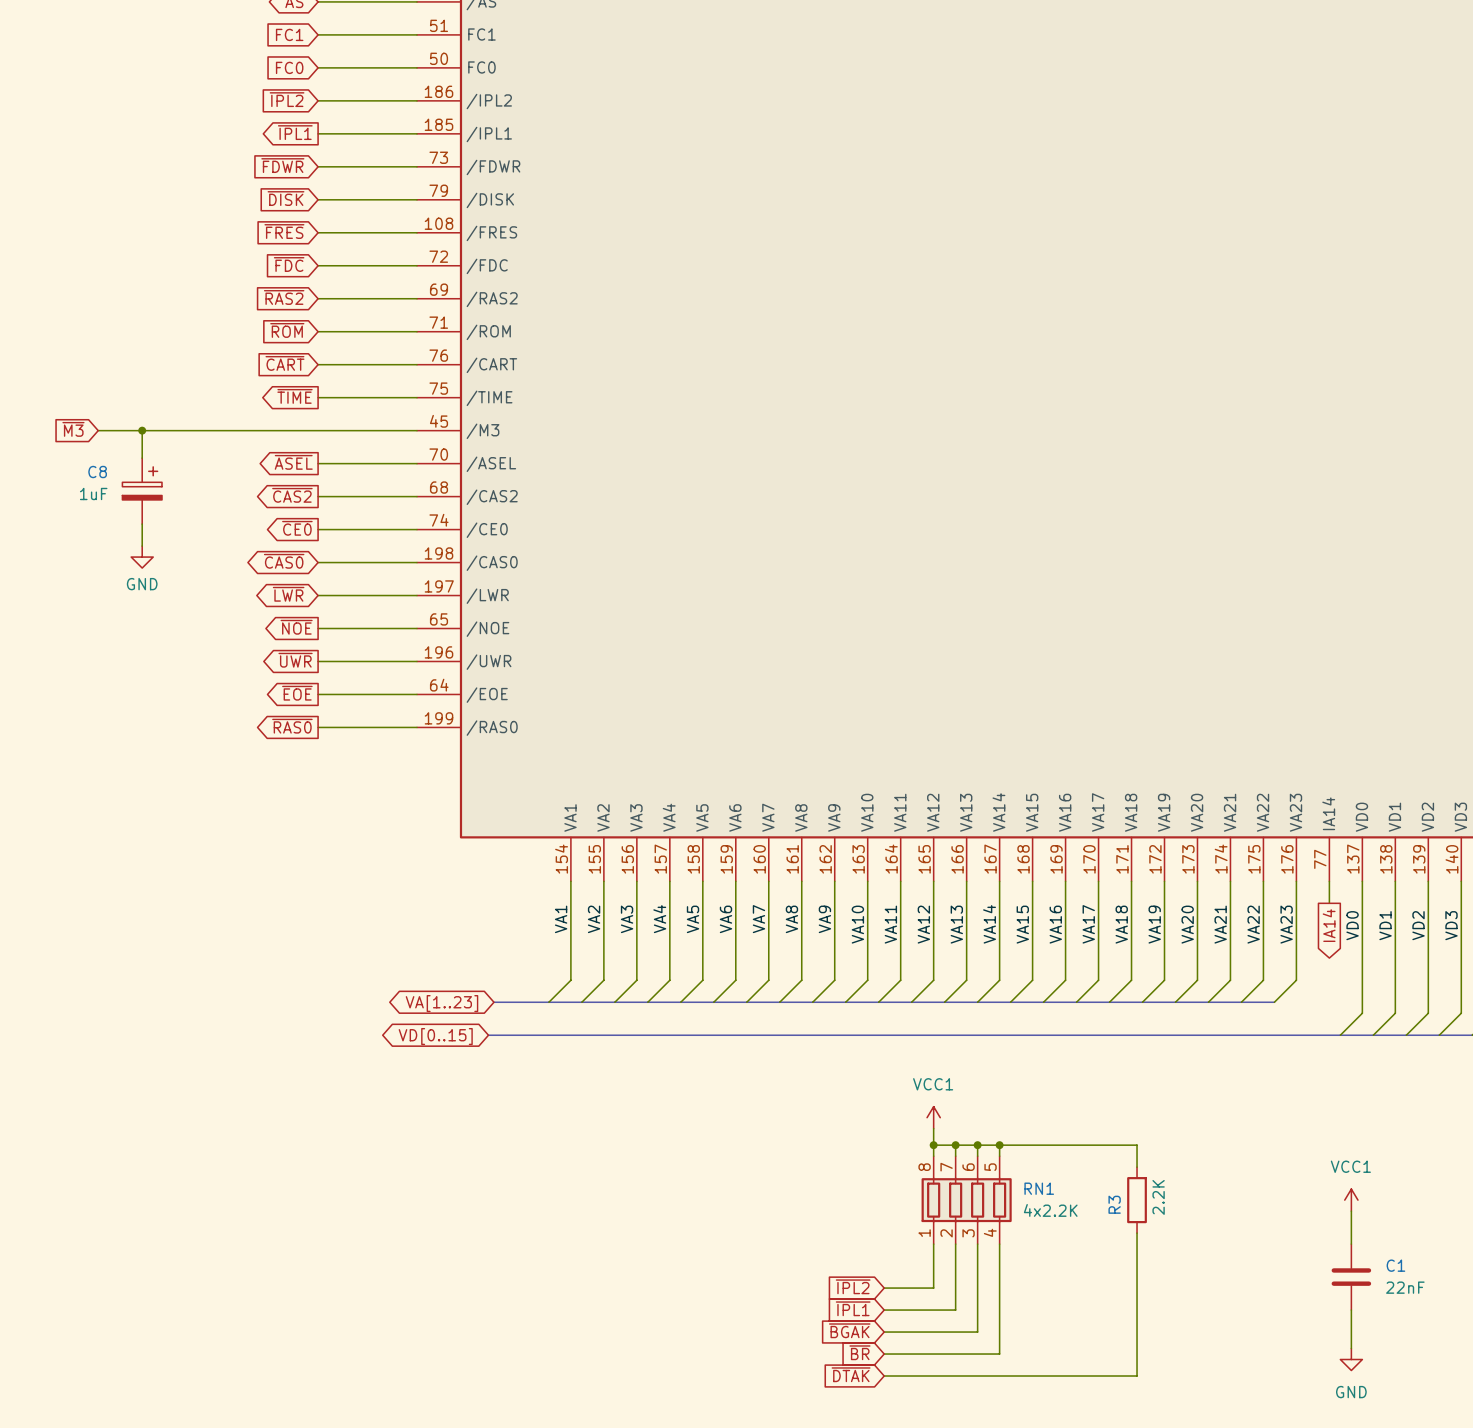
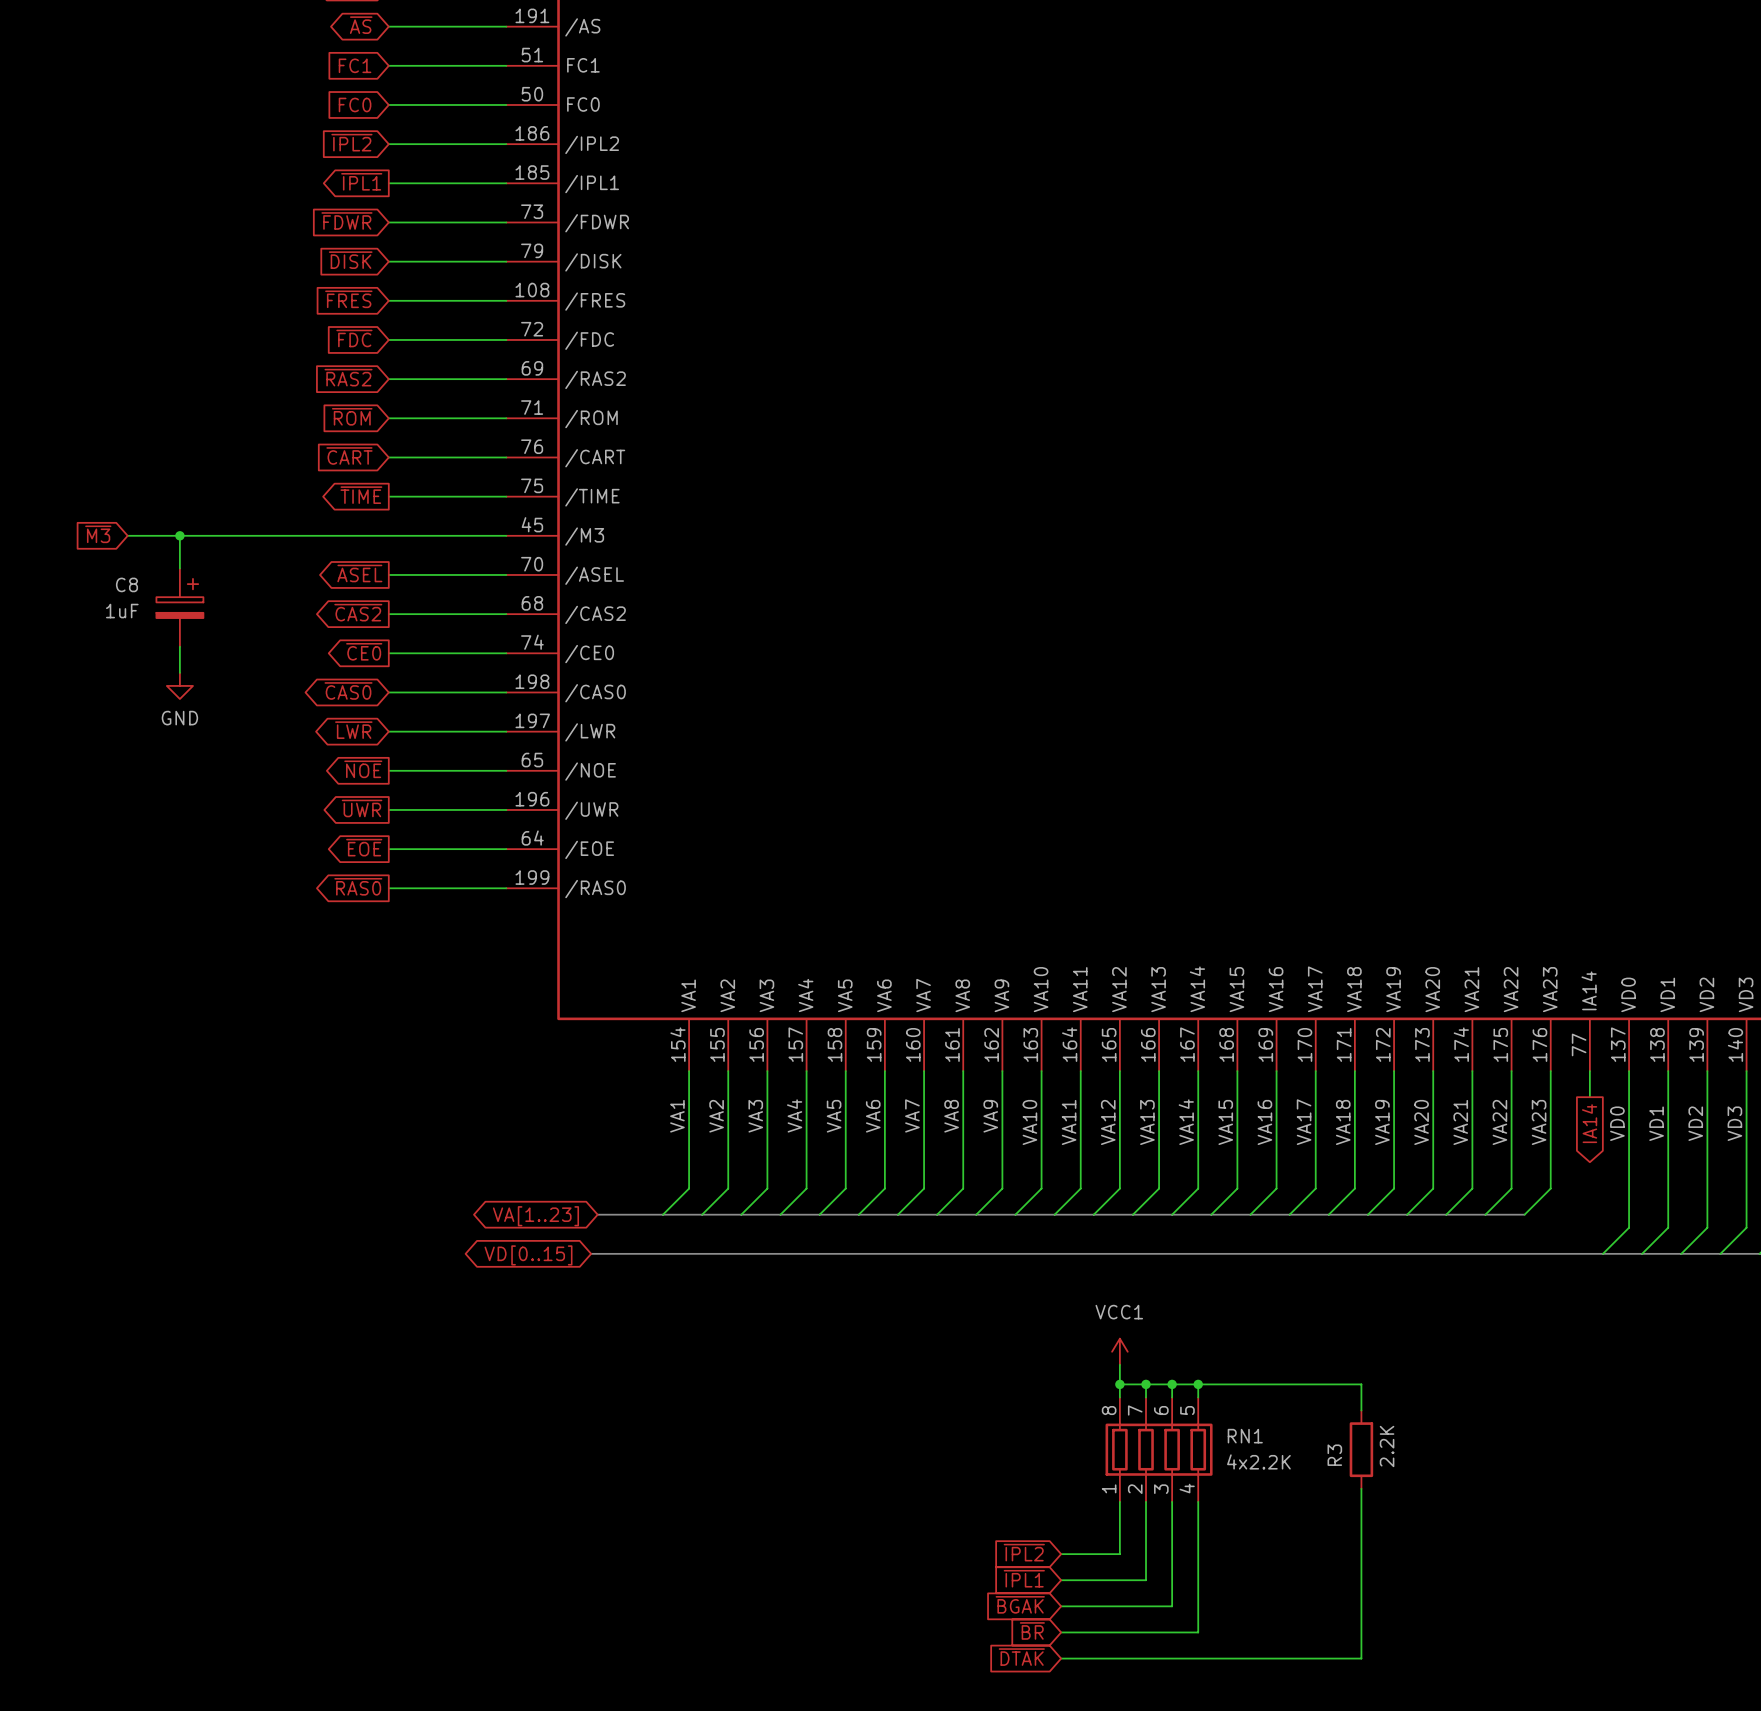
power symbol: VCC1 (1351, 1200) -> none
wire: (1351, 1211) (1351, 1244) -> none
C1: 22nF (1351, 1277) -> none
wire: (1351, 1310) (1351, 1348) -> none
power symbol: GND (1351, 1359) -> none

